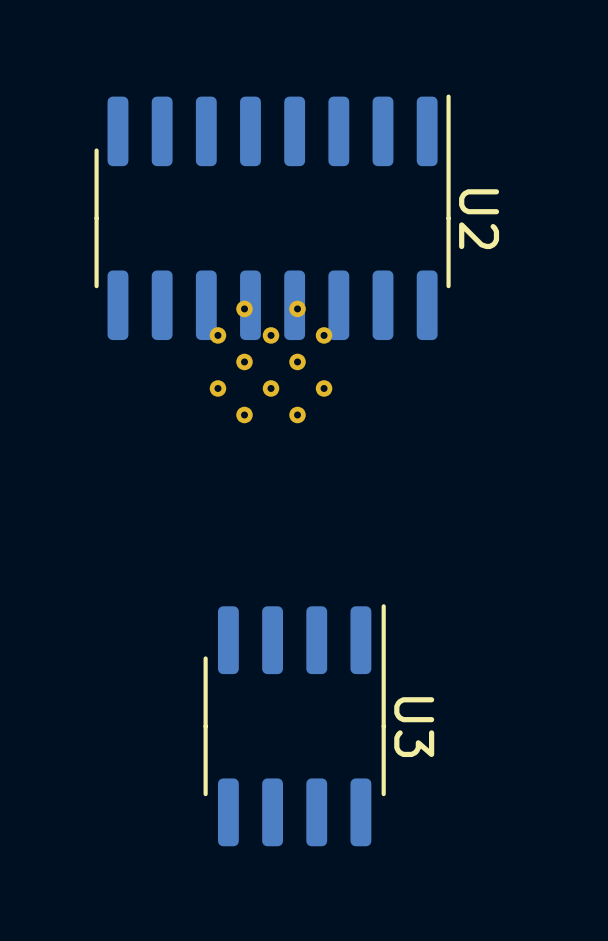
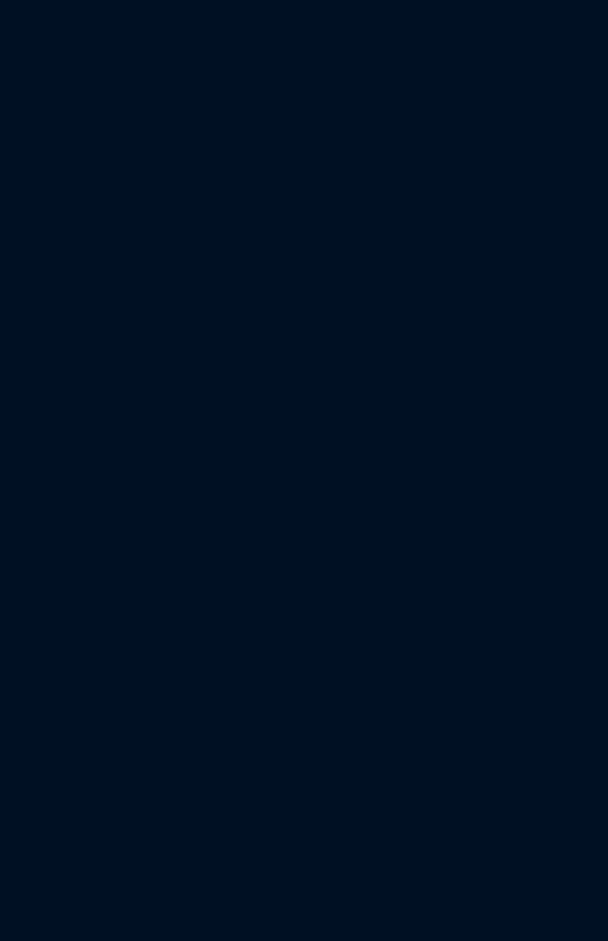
U2: (272, 217) -> none
part: (271, 361) -> none
U3: (294, 725) -> none

